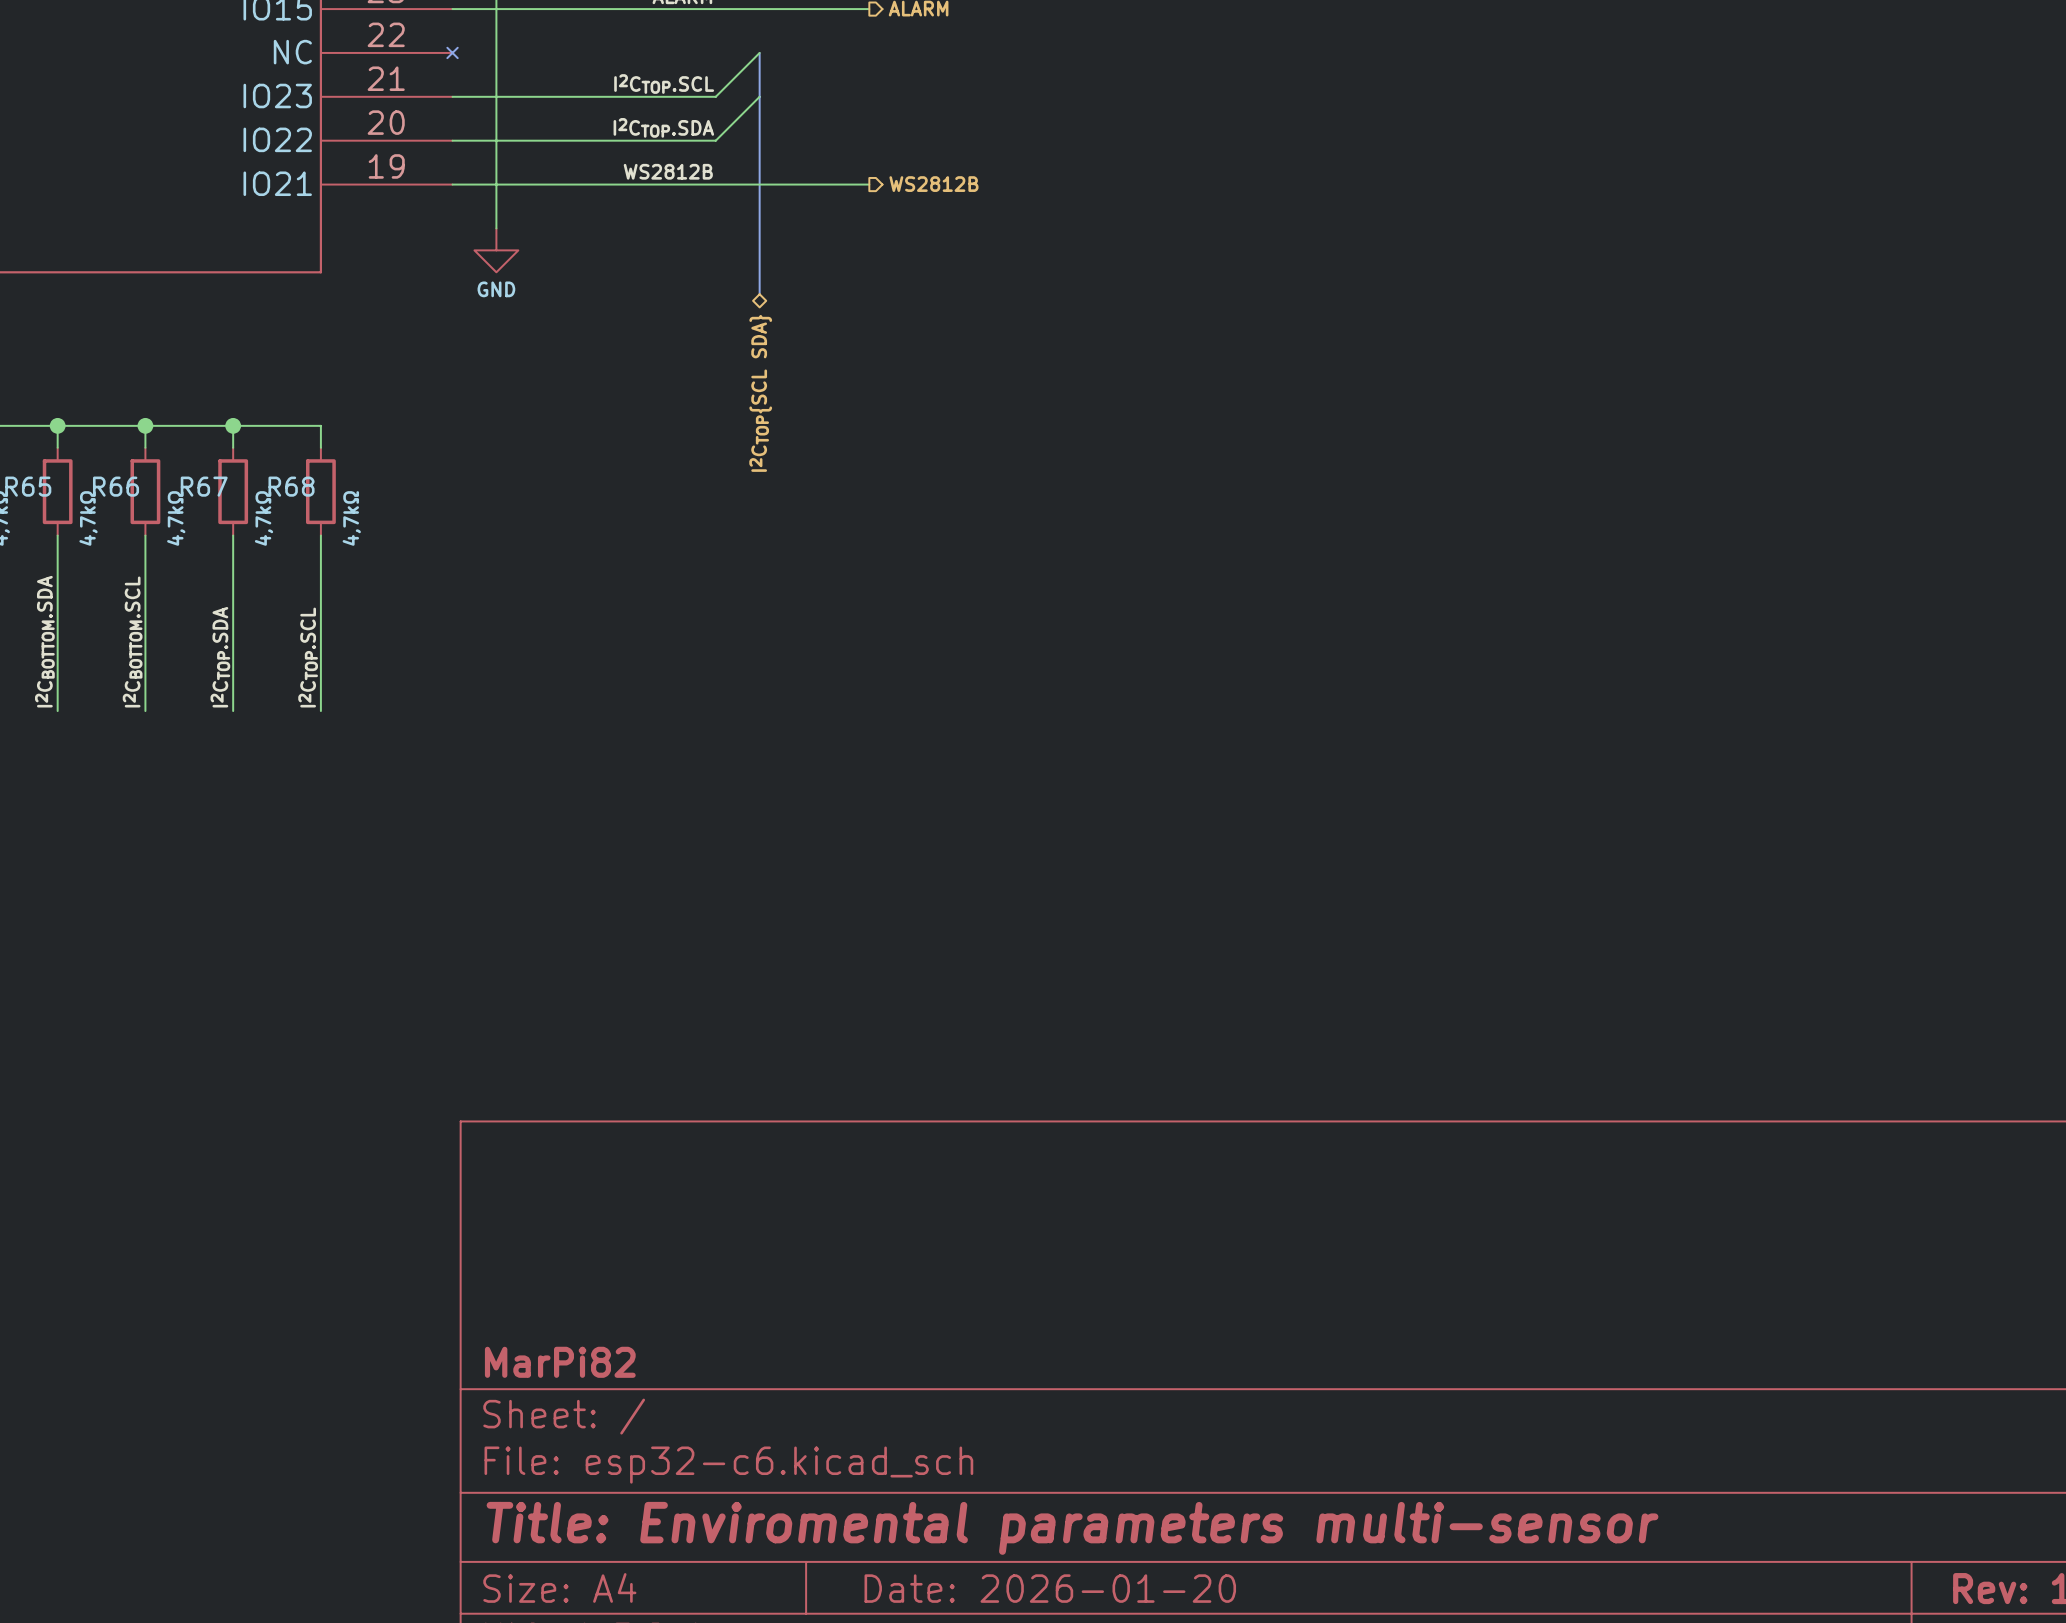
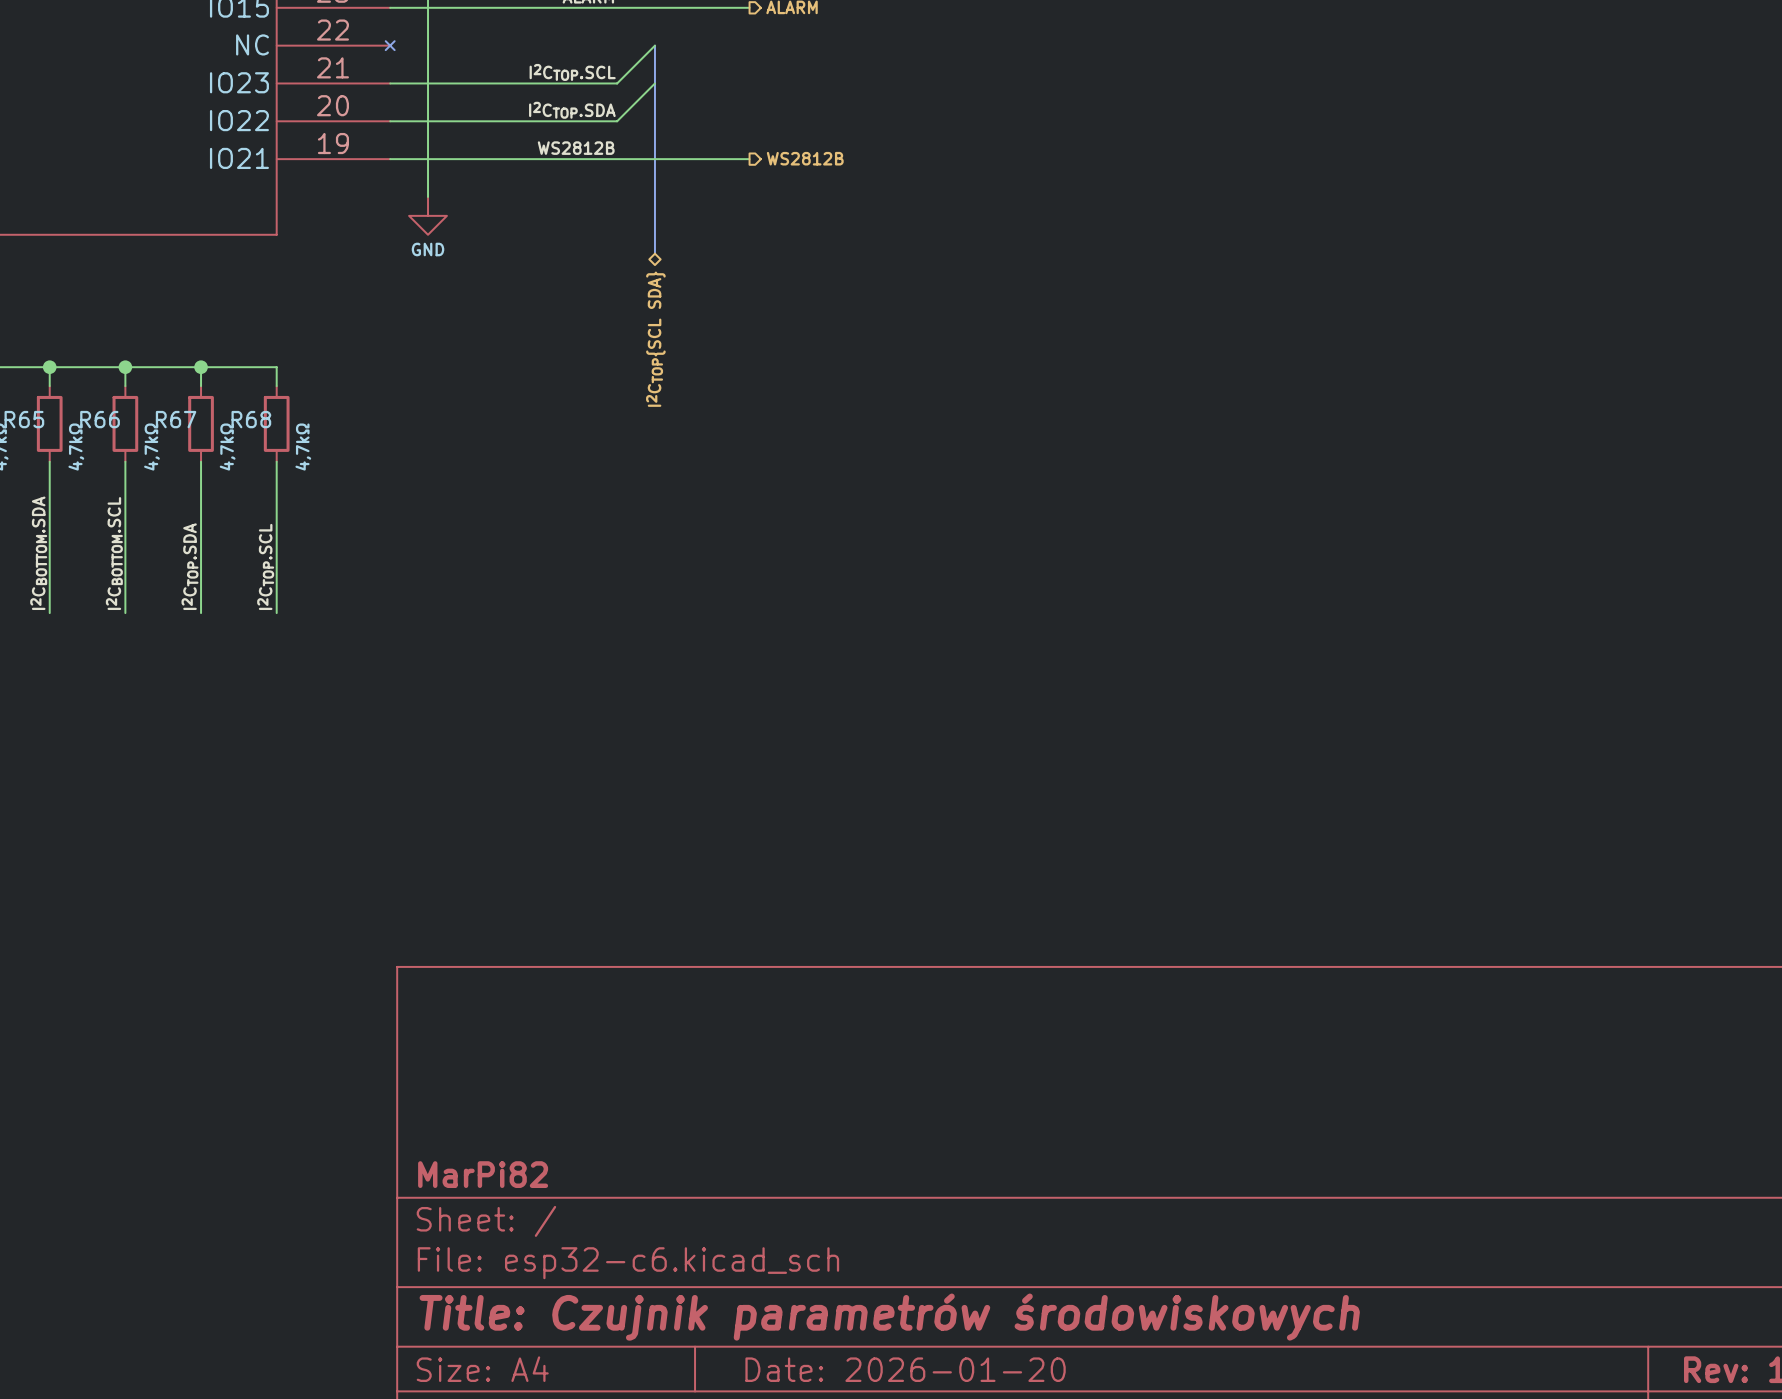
title block: Title: Enviromental parameters multi-sensor (1072, 1528) -> Title: Czujnik parametrów środowiskowych (889, 1317)

